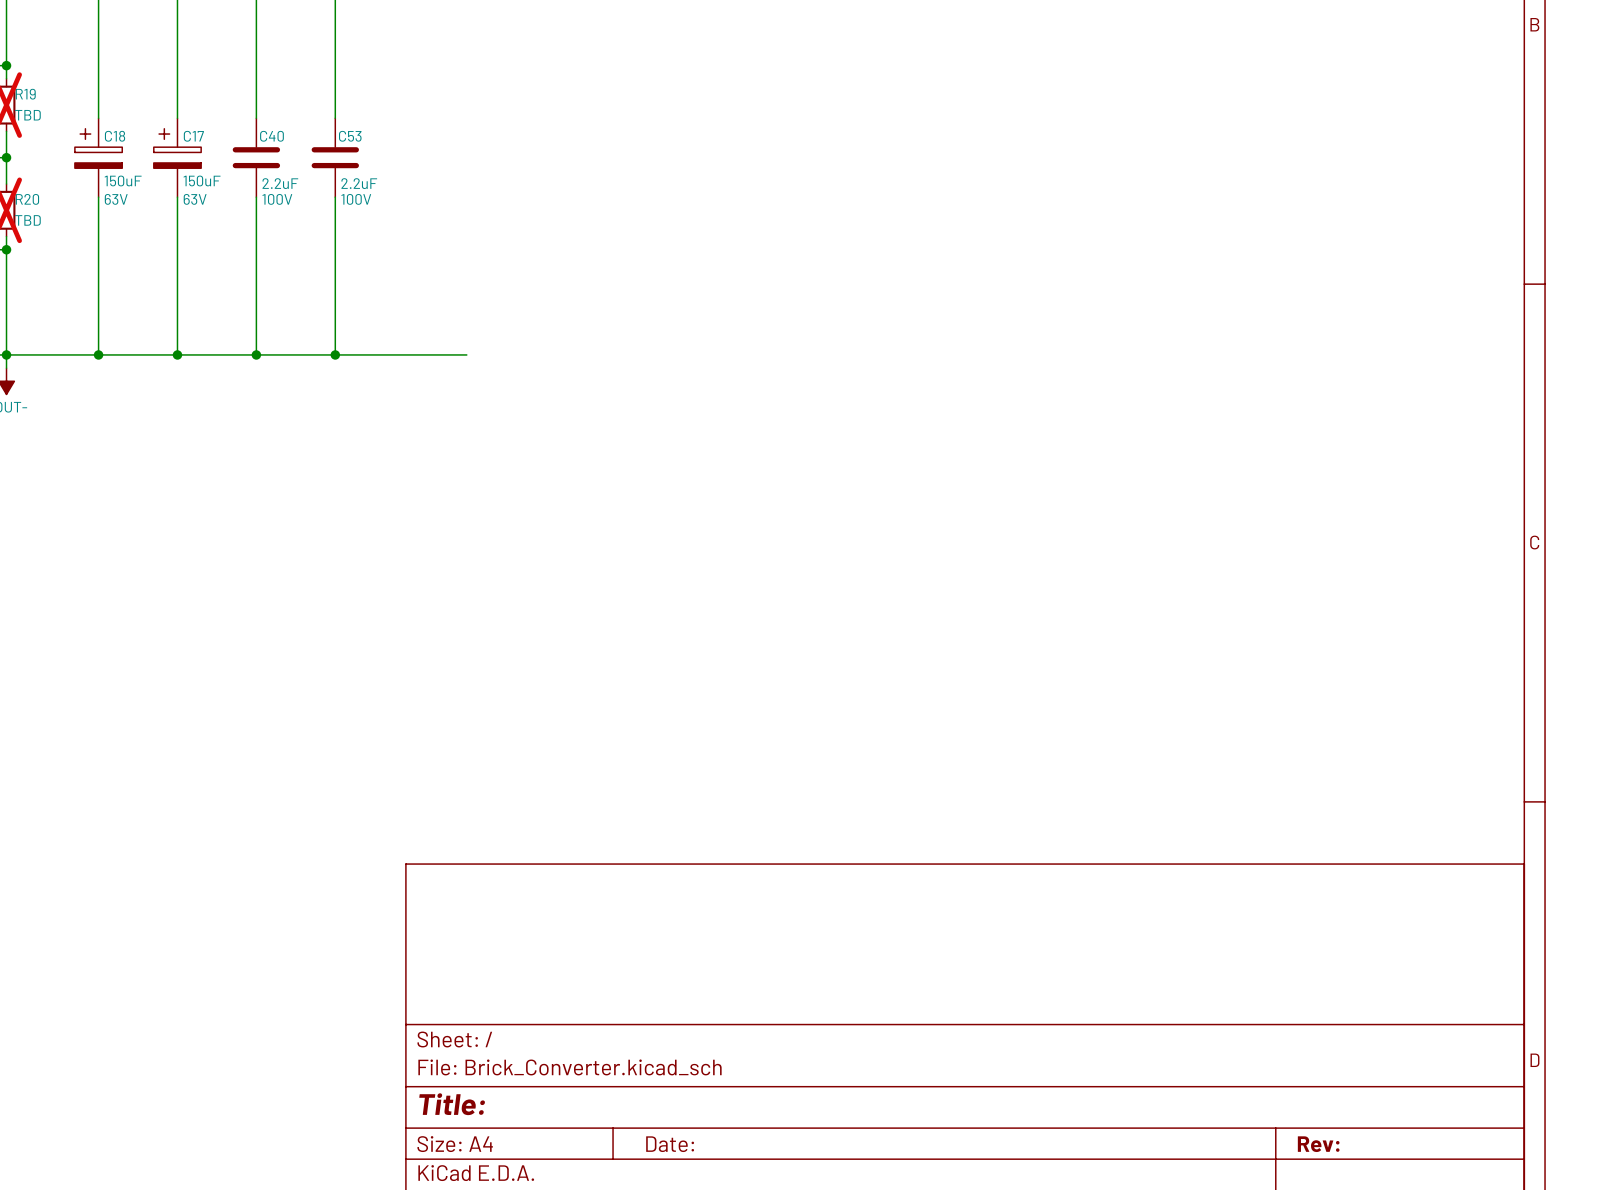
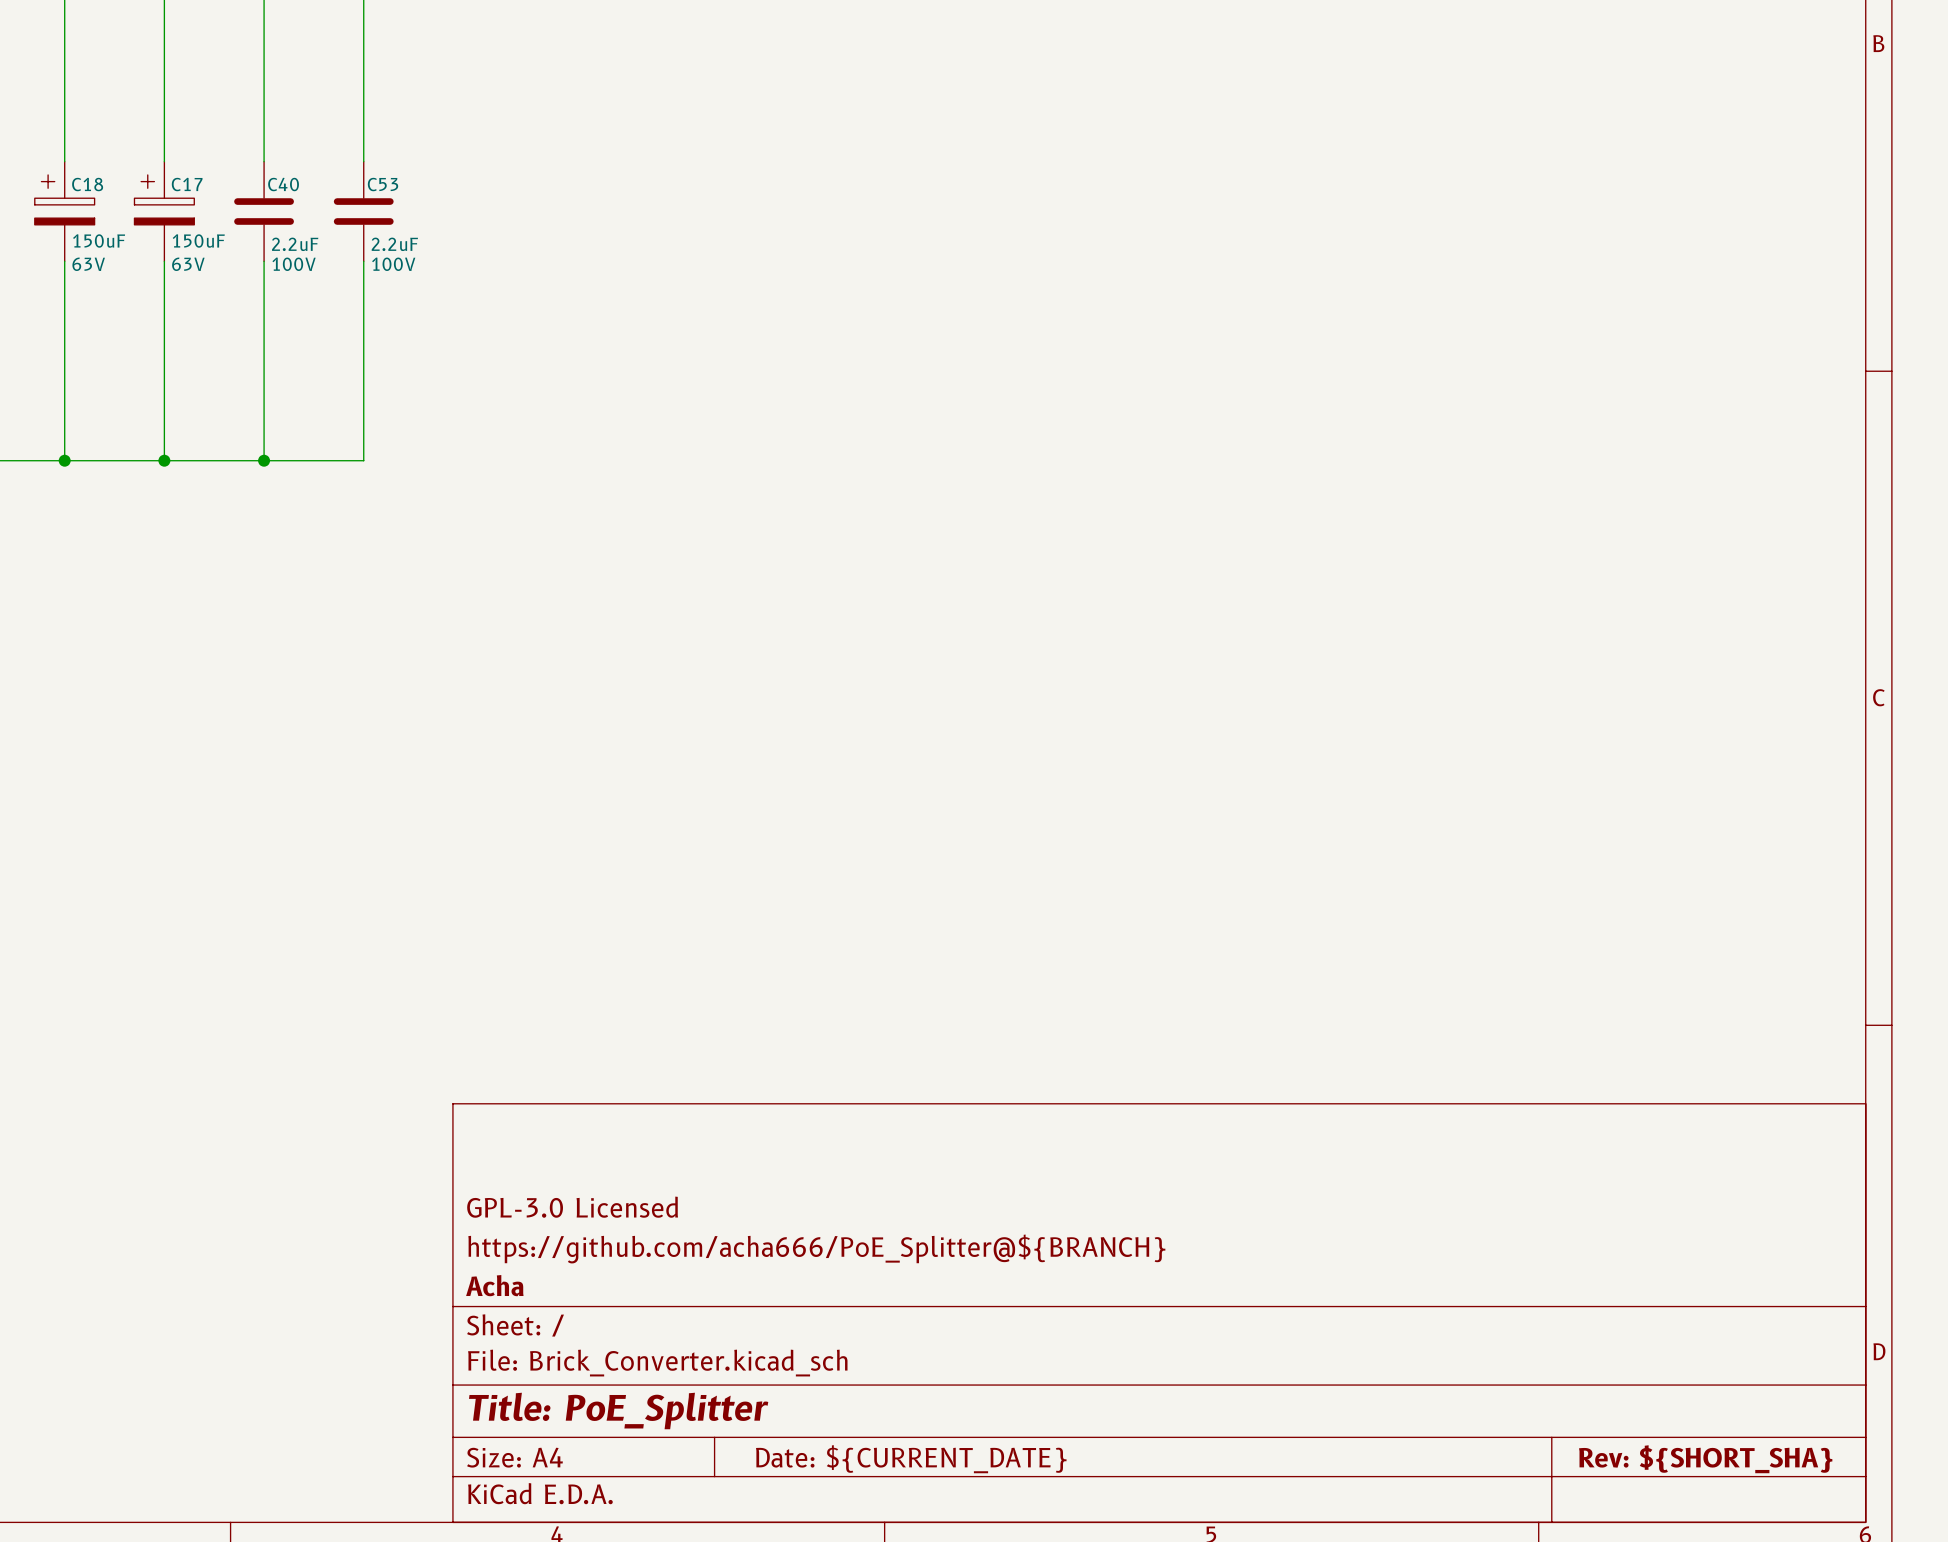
wire: (335, 354) (466, 354) -> none
junction: (335, 354) -> none
title block: none -> GPL-3.0 Licensed (572, 1207)
title block: none -> https://github.com/acha666/PoE_Splitter@${BRANCH} (816, 1248)
title block: none -> Acha (494, 1285)
title block: Title: (452, 1104) -> Title: PoE_Splitter (618, 1410)
title block: Date: (670, 1144) -> Date: ${CURRENT_DATE} (911, 1459)
title block: Rev: (1318, 1144) -> Rev: ${SHORT_SHA} (1705, 1459)

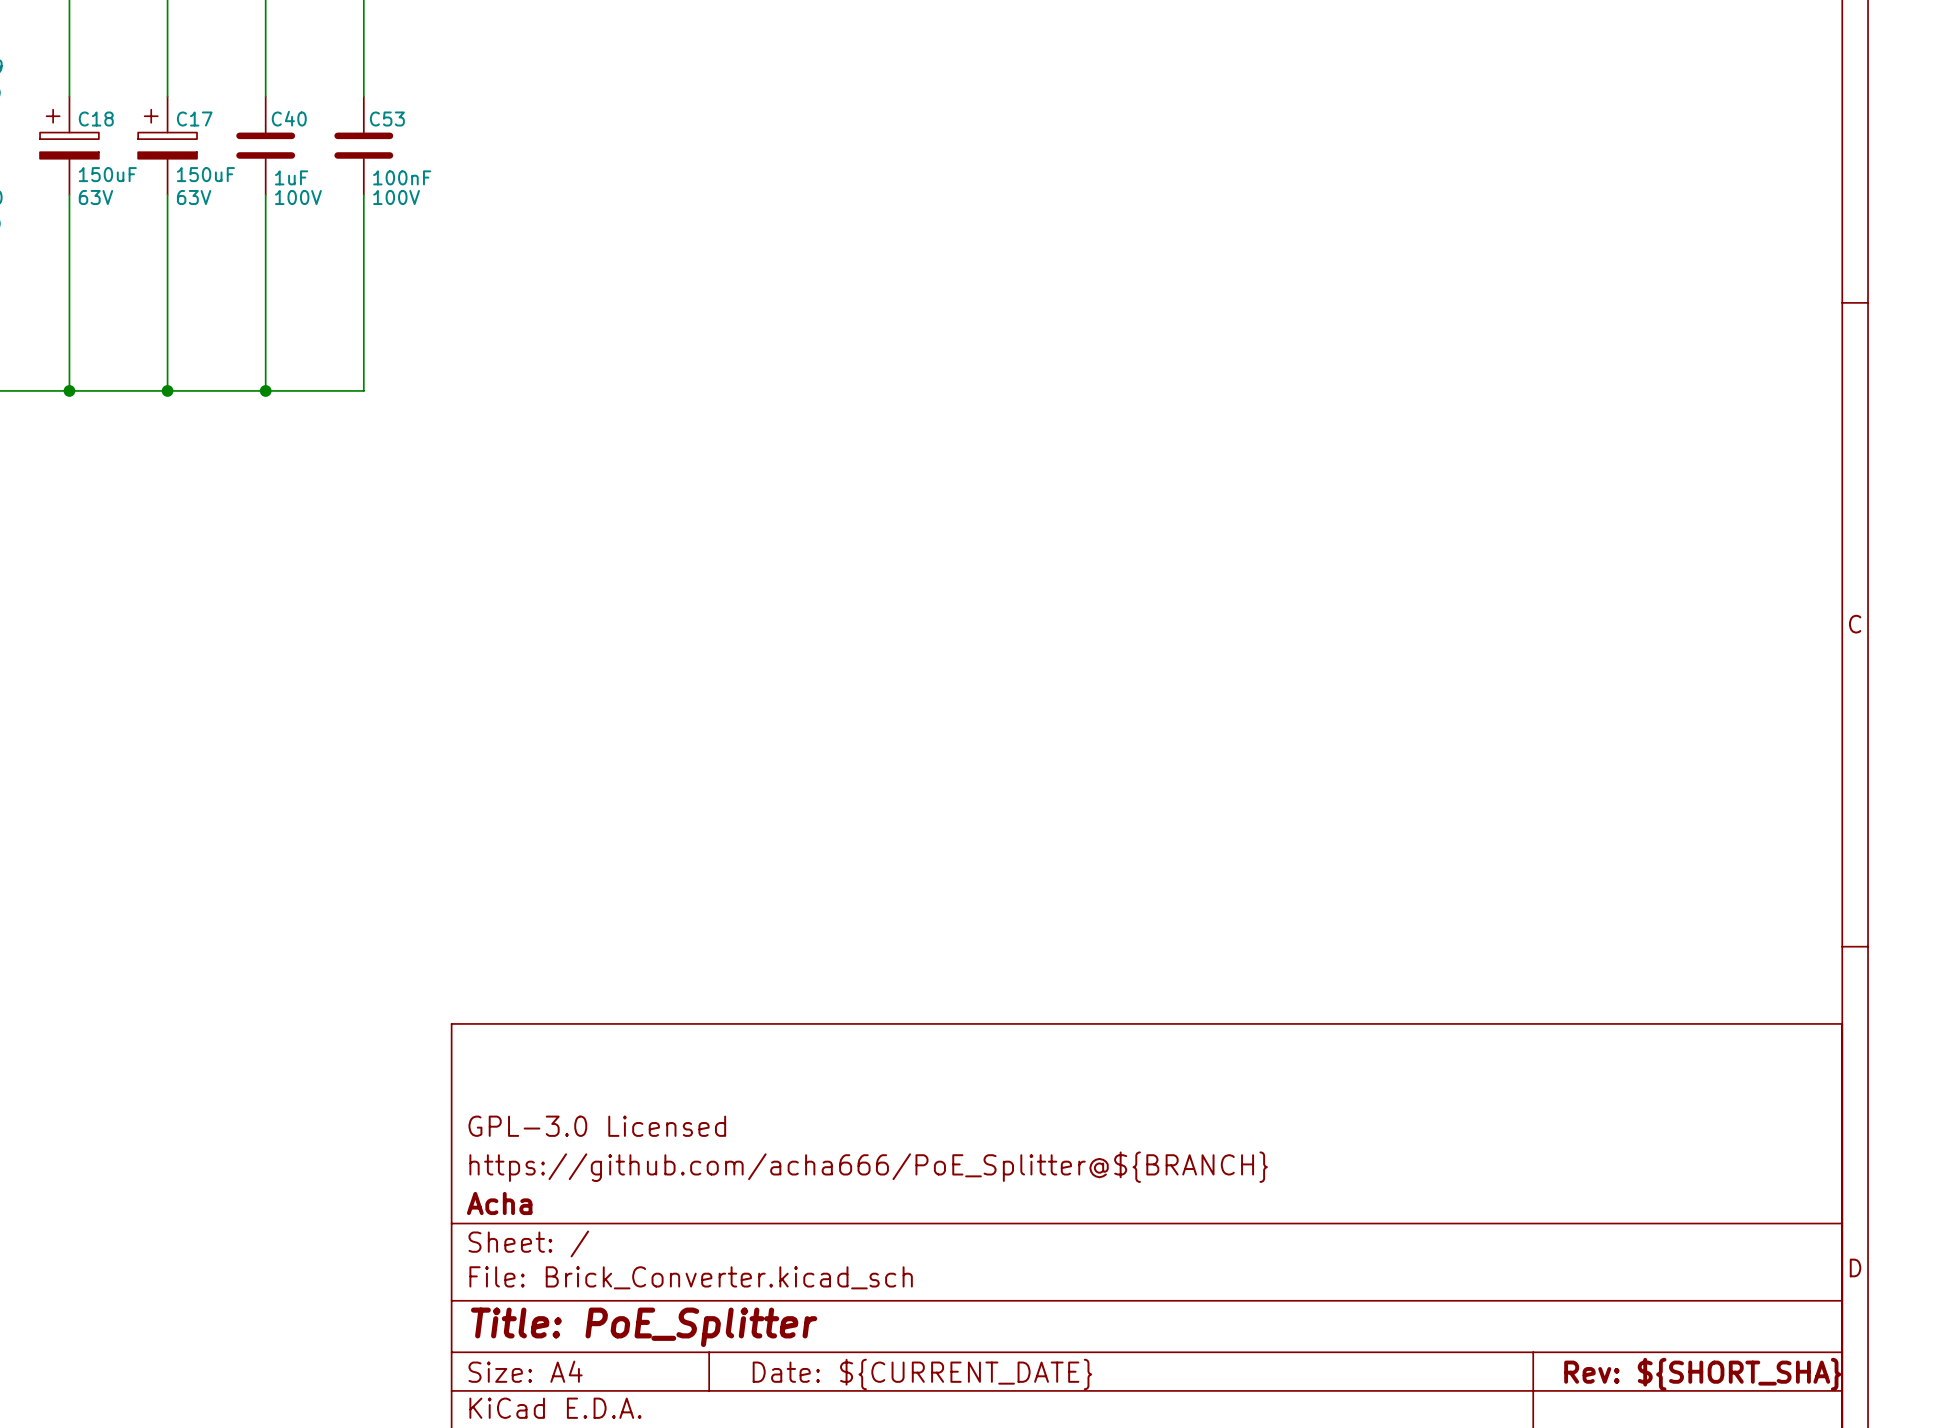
C40 value: 2.2uF (295, 244) -> 1uF (291, 177)
C53 value: 2.2uF (394, 244) -> 100nF (402, 177)

